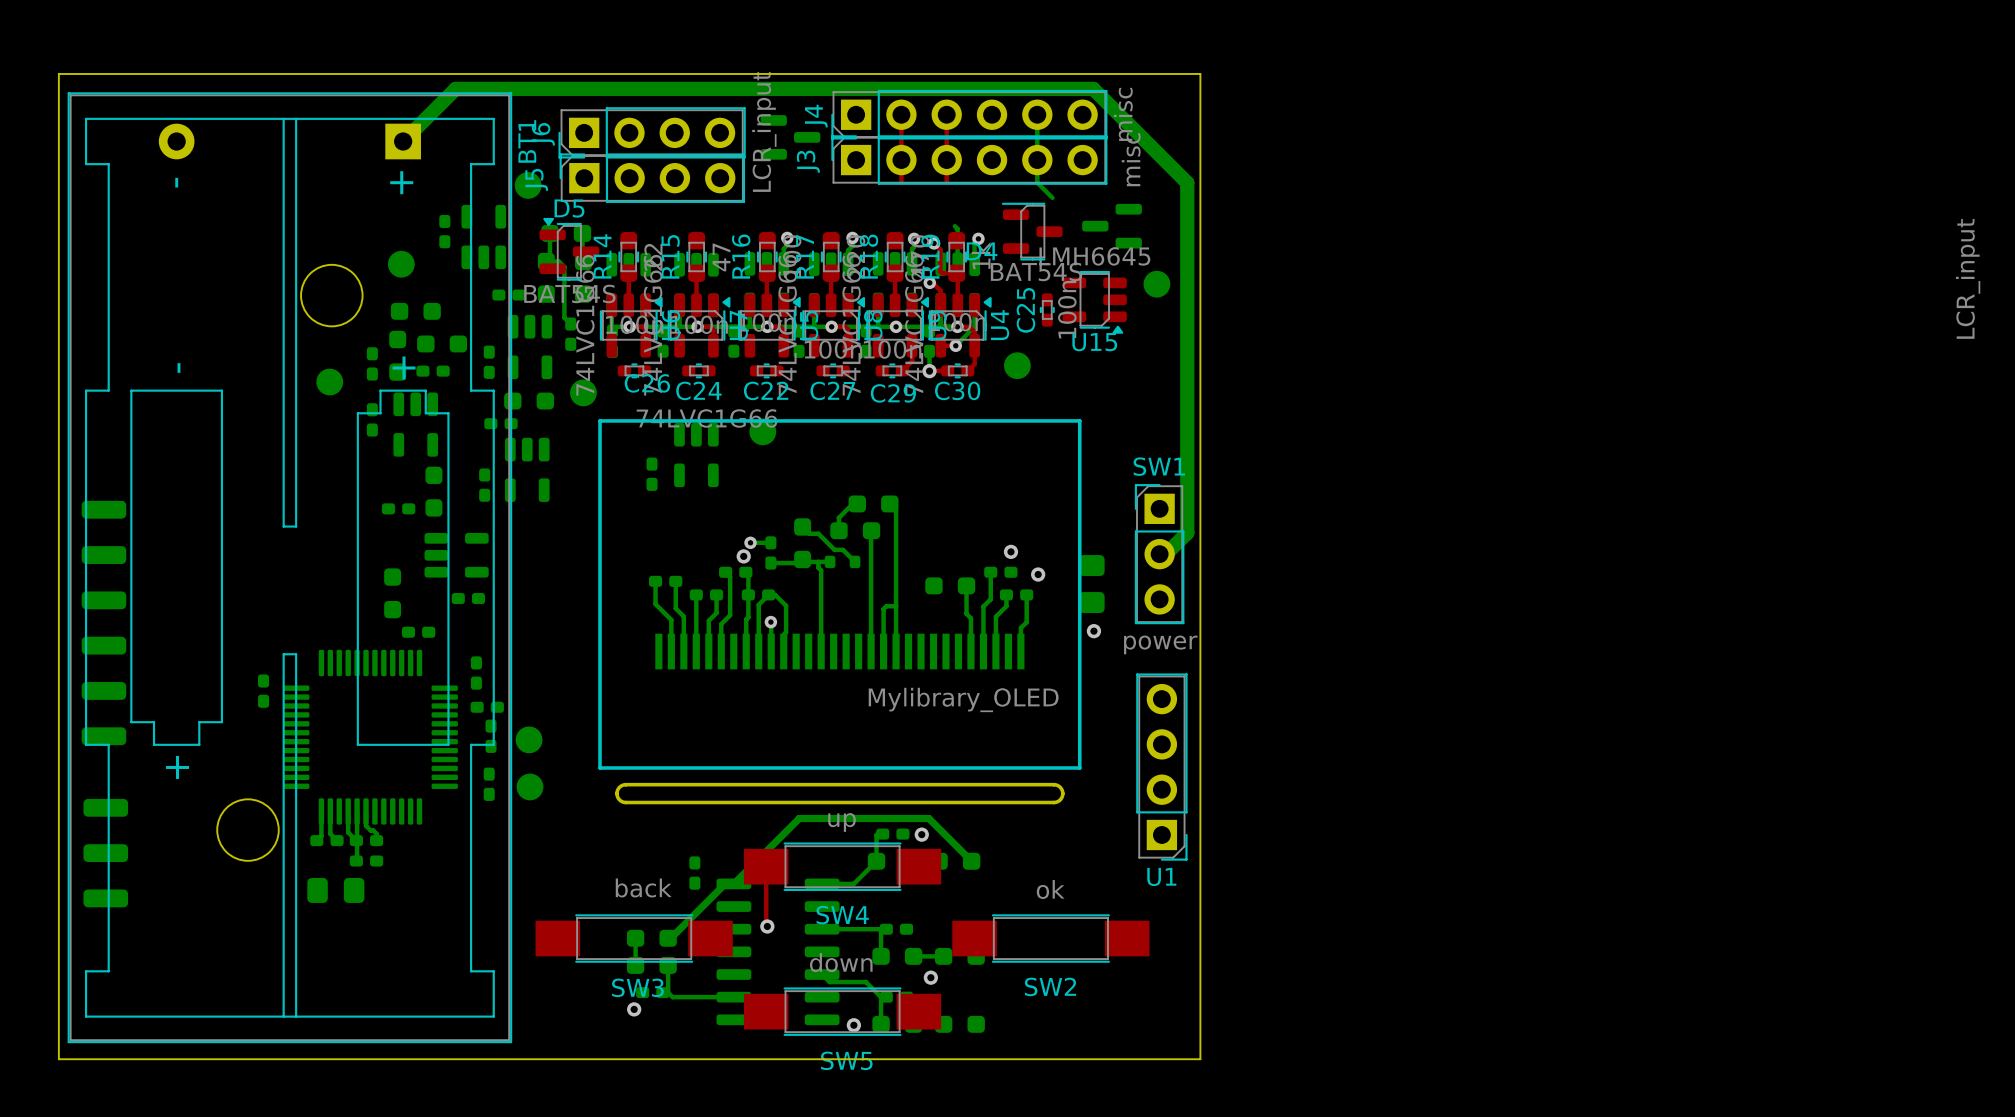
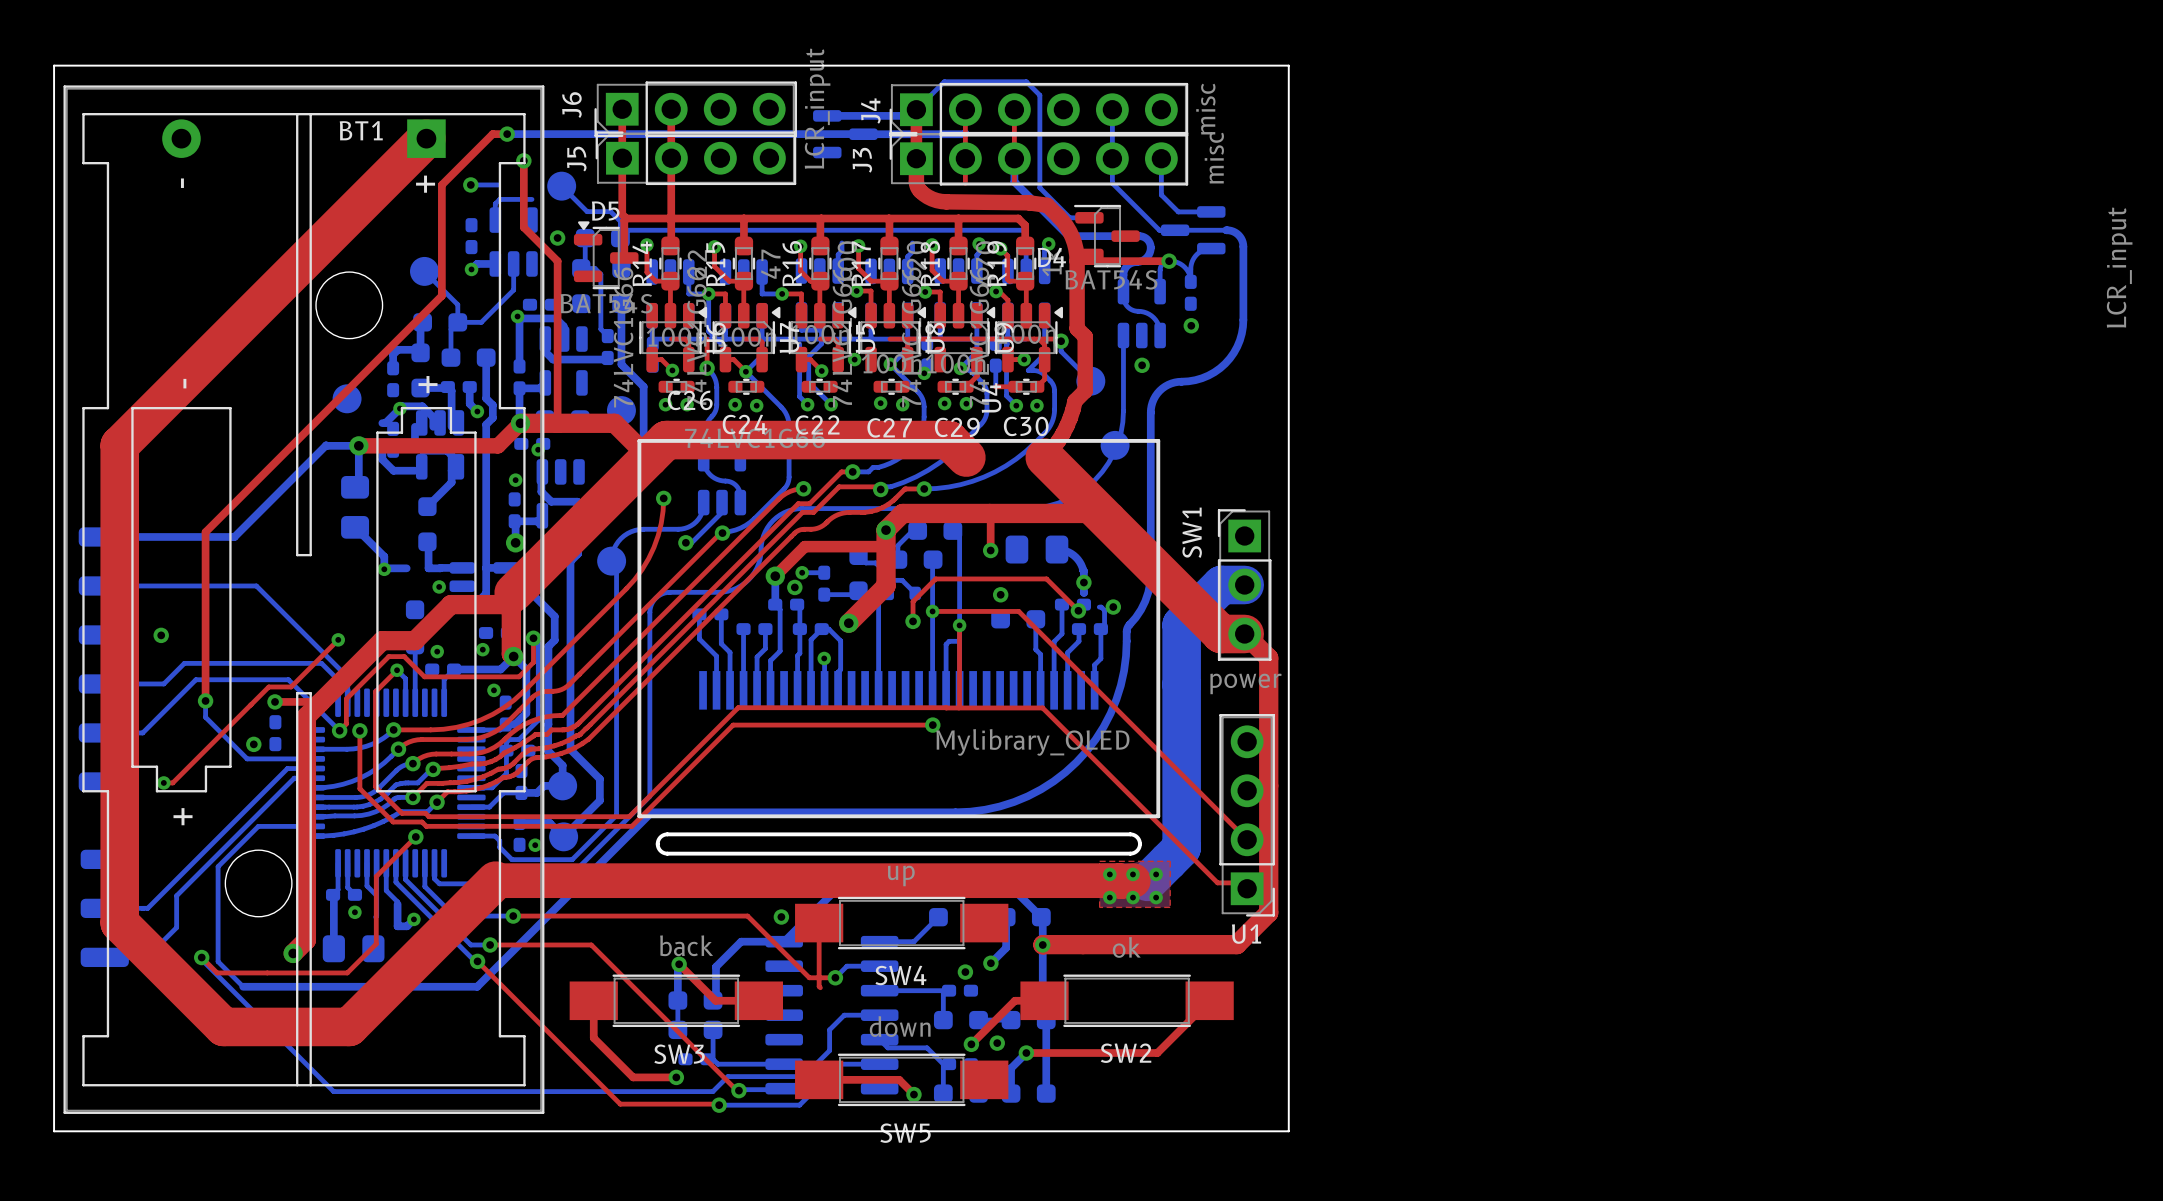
bottom track: (881, 88) (455, 88) (403, 141) -> (944, 81) (910, 115) (827, 115)
bottom track width: thick (881, 88) (957, 88) -> thin (944, 81) (1026, 81)
bottom track: (957, 88) (1093, 88) (1187, 182) (1187, 532) (1166, 554) -> (1026, 81) (1039, 95) (1039, 187) (1069, 217) (1089, 217)
top track: none -> (622, 109) (622, 214) (626, 218)
top track: none -> (671, 109) (670, 245)
top track: none -> (916, 109) (916, 181) (920, 191) (927, 196) (941, 201) (1029, 202) (1047, 205) (1069, 231) (1075, 248) (1077, 261)
J6 position: (652, 132) -> (695, 109)
J6 name position: J6 (543, 134) -> J6 (571, 105)
bottom track: none -> (965, 133) (863, 134)
bottom track: none -> (507, 134) (863, 134)
top track: none -> (507, 134) (492, 134) (441, 184) (441, 295) (205, 532) (205, 700)
via: none -> (507, 134)
top track: none -> (426, 138) (119, 445) (119, 923) (223, 1026) (349, 1026) (495, 880)
BT1 name rotation: 0° (527, 141) -> 90° clockwise (361, 130)
BT1 name position: BT1 (527, 141) -> BT1 (361, 130)
bottom track: none -> (1014, 158) (1014, 181) (1068, 236) (1139, 236) (1148, 240) (1150, 247) (1147, 256) (1141, 261) (1129, 263) (1124, 270) (1123, 298) (1130, 309) (1146, 312) (1153, 317) (1158, 324) (1160, 335)
bottom track: none -> (1161, 158) (1161, 194) (1178, 211) (1211, 211)
top track: none -> (523, 160) (523, 227) (557, 261) (557, 423)
via: none -> (523, 160)
J5 position: (652, 178) -> (695, 158)
J5 name position: J5 (536, 179) -> J5 (576, 159)
bottom track: none -> (470, 184) (498, 184)
via: none -> (470, 184)
bottom track: none -> (561, 186) (587, 211) (610, 211) (620, 221) (620, 238) (628, 230) (1023, 230)
bottom track: none -> (531, 199) (499, 199) (495, 203) (495, 220)
bottom track: none -> (1128, 199) (1159, 230) (1226, 230) (1238, 235) (1243, 246) (1242, 326) (1237, 346) (1229, 358) (1220, 368) (1202, 378) (1168, 384) (1159, 390) (1153, 399) (1150, 412) (1150, 573) (1148, 592) (1141, 609) (1127, 629) (1124, 670) (1110, 713) (1086, 751) (1053, 781) (1014, 802) (970, 811) (651, 812) (477, 986) (243, 986) (218, 961) (218, 866) (258, 826) (310, 826)
top track: none -> (626, 218) (1018, 218) (1025, 225) (1025, 245)
top track: none -> (626, 218) (624, 220) (624, 257)
top track: none -> (743, 218) (743, 245)
top track: none -> (821, 218) (820, 245)
top track: none -> (888, 218) (889, 245)
top track: none -> (958, 218) (958, 245)
via: none -> (557, 238)
via position: (787, 237) -> (858, 245)
via position: (852, 237) -> (932, 244)
top track: none -> (646, 244) (646, 272) (655, 281) (670, 281)
via: none -> (646, 244)
top track: none -> (932, 244) (932, 270) (942, 281) (958, 281)
top track: none -> (800, 246) (800, 271) (810, 281) (820, 281)
via: none -> (800, 246)
top track: none -> (858, 245) (858, 268) (871, 281) (889, 281)
top track: none -> (714, 246) (714, 266) (729, 281) (743, 281)
via: none -> (714, 246)
bottom track: none -> (1211, 248) (1200, 251) (1193, 258) (1190, 266) (1190, 281) (1188, 271) (1182, 265) (1172, 261) (1163, 263) (1160, 269) (1160, 291)
top track: none -> (1077, 261) (1169, 261)
top track: none -> (1077, 261) (1077, 328) (1085, 336) (1085, 390) (1075, 401) (1063, 433) (1044, 457) (1221, 633) (1244, 633) (1268, 658) (1268, 912) (1236, 944) (1042, 944)
via: none -> (1169, 261)
bottom track: none -> (495, 263) (477, 263) (471, 269)
bottom track: none -> (513, 263) (513, 290) (481, 322) (457, 322)
via: none -> (471, 269)
bottom track: none -> (424, 271) (457, 304) (457, 322)
bottom track: none -> (688, 272) (688, 293) (708, 293) (708, 331) (723, 345)
bottom track: none -> (762, 272) (762, 293) (782, 293)
top track: none -> (856, 291) (871, 291) (871, 315)
via: none -> (856, 291)
top track: none -> (925, 291) (940, 291) (940, 315)
via: none -> (925, 291)
part: (1156, 284) -> none
top track: none -> (708, 293) (725, 293) (725, 315)
via: none -> (708, 293)
top track: none -> (782, 293) (801, 293) (801, 315)
via: none -> (782, 293)
bottom track: none -> (621, 303) (621, 364) (643, 386) (643, 442) (579, 506) (578, 522)
U15 side: top (1094, 302) -> bottom (1141, 313)
bottom track: none -> (907, 315) (907, 348) (890, 364) (922, 398) (924, 416) (920, 434) (910, 449) (895, 460) (884, 465) (873, 467) (868, 471) (852, 471)
bottom track: none -> (976, 314) (976, 352) (960, 368) (972, 372) (985, 387) (986, 410) (984, 420) (960, 445) (939, 462) (916, 476) (891, 486) (883, 486) (880, 489)
bottom track: (974, 304) (974, 327) (955, 345) -> (1044, 315) (1044, 354) (1028, 370) (1040, 372) (1053, 385) (1054, 412) (1048, 428) (1025, 451) (995, 471) (960, 484) (924, 488)
via: none -> (517, 316)
bottom track: none -> (762, 315) (762, 355) (745, 371) (781, 407) (787, 415) (789, 426) (788, 479) (784, 488) (750, 522) (740, 528) (722, 533)
C25 side: top (1047, 309) -> bottom (1190, 292)
bottom track: none -> (422, 322) (420, 324) (420, 352) (417, 349) (398, 349) (393, 354) (393, 368)
bottom track: none -> (457, 322) (450, 329) (450, 357)
via: none -> (1191, 325)
bottom track: (749, 318) (749, 326) -> (801, 330) (821, 330) (821, 343) (808, 356) (808, 382) (832, 404)
bottom track: none -> (1123, 335) (1123, 411) (1121, 432) (1108, 463) (1086, 487) (1058, 503) (1037, 507) (802, 508) (788, 510) (780, 514) (773, 520) (765, 531) (756, 568) (751, 576) (741, 585) (723, 592) (664, 593) (655, 598) (651, 604) (649, 796) (562, 883) (439, 883) (434, 878) (434, 863)
U4 name position: U4 (1000, 325) -> U4 (991, 397)
bottom track: none -> (545, 339) (545, 351) (553, 359) (606, 359) (607, 357)
bottom track: none -> (563, 339) (563, 326) (555, 318) (519, 318) (519, 366)
via: (629, 326) -> none
top track: none -> (707, 339) (707, 368)
via: (697, 326) -> none
via: (767, 326) -> none
via: (831, 326) -> none
via: (896, 326) -> none
via: (957, 326) -> none
bottom track: none -> (1061, 341) (1061, 351) (1090, 381)
via: none -> (1061, 341)
bottom track: none -> (799, 343) (799, 396) (807, 404)
bottom track: none -> (1007, 343) (1006, 395) (1016, 405)
part: (663, 341) -> none
part: (733, 341) -> none
part: (799, 341) -> none
bottom track: none -> (486, 357) (486, 398) (492, 405) (492, 417) (486, 424) (486, 593) (475, 604) (462, 604)
top track: none -> (652, 359) (661, 359) (672, 370)
top track: none -> (725, 359) (733, 359) (745, 371)
top track: none -> (801, 359) (810, 359) (821, 370)
via: none -> (854, 359)
via: none -> (890, 364)
via: none -> (1142, 365)
bottom track: none -> (707, 368) (715, 381) (716, 404) (714, 413) (704, 429) (704, 464) (708, 472) (714, 478) (730, 481) (735, 485) (739, 492) (740, 502)
via: none -> (707, 368)
via: none -> (960, 368)
via: none -> (672, 370)
via: none -> (745, 371)
via: none -> (821, 370)
via: none -> (924, 373)
bottom track: none -> (545, 382) (539, 388) (519, 388) (520, 423)
bottom track: none -> (469, 387) (469, 403) (477, 411)
via: (929, 371) -> none
bottom track: none -> (420, 388) (447, 387) (451, 390) (451, 426)
via: none -> (880, 403)
via: none -> (944, 403)
via: none -> (966, 403)
via: none -> (665, 404)
via: none -> (687, 404)
via: none -> (735, 404)
via: none -> (807, 404)
via: none -> (831, 404)
via: none -> (902, 404)
via: none -> (756, 405)
via: none -> (1016, 405)
via: none -> (1036, 405)
C24 name position: C24 (698, 390) -> C24 (744, 424)
C22 name position: C22 (766, 390) -> C22 (817, 425)
C27 name position: C27 (832, 390) -> C27 (889, 427)
C30 name position: C30 (957, 390) -> C30 (1026, 426)
via: none -> (399, 408)
via: none -> (477, 411)
C29 name position: C29 (893, 393) -> C29 (957, 427)
bottom track: none -> (382, 423) (385, 423) (402, 406) (422, 406) (433, 417) (433, 426)
via: none -> (520, 423)
bottom track: none -> (414, 426) (414, 442) (422, 450) (447, 450) (451, 455) (451, 482) (427, 506)
bottom track: none -> (358, 445) (358, 483) (355, 487)
bottom track: none -> (358, 445) (326, 445) (234, 536) (102, 536)
bottom track: none -> (358, 445) (382, 445) (382, 459) (393, 470) (414, 470)
top track: none -> (358, 445) (497, 445) (520, 423) (614, 423) (648, 457)
via: none -> (358, 445)
part: none -> (1115, 445)
via: none -> (538, 449)
part: (762, 431) -> none
top track: none -> (966, 457) (948, 440) (666, 440) (513, 592)
top track: none -> (852, 471) (841, 471) (809, 503) (798, 503) (577, 724) (567, 729) (551, 729) (547, 734) (535, 734) (524, 742)
via: none -> (852, 471)
bottom track: none -> (541, 478) (541, 491) (551, 501) (578, 502) (578, 553) (570, 561) (570, 749) (599, 779) (599, 800) (563, 836) (549, 822) (519, 822)
part rotation: 0° (696, 455) -> 180° (722, 480)
via: none -> (515, 480)
top track: none -> (803, 488) (790, 491) (778, 499) (562, 715) (545, 716) (531, 721) (517, 728) (494, 747) (482, 752) (431, 754) (423, 756) (412, 763)
via: none -> (803, 488)
top track: none -> (880, 489) (878, 486) (839, 486) (813, 512) (802, 512) (579, 734) (554, 745) (531, 749) (509, 766) (475, 779) (458, 782) (426, 783) (412, 797)
via: none -> (880, 489)
top track: none -> (924, 488) (904, 488) (888, 504) (877, 509) (840, 513) (819, 527) (797, 531) (588, 739) (561, 753) (531, 758) (513, 775) (503, 777) (489, 784) (466, 791) (447, 791) (437, 802)
via: none -> (924, 488)
SW1 name rotation: 0° (1159, 466) -> 90° counterclockwise (1192, 532)
top track: none -> (663, 498) (658, 535) (642, 569) (626, 588) (514, 700) (492, 714) (456, 727) (393, 729)
via: none -> (663, 498)
part: (652, 474) -> none
bottom track: none -> (703, 502) (700, 516) (690, 525) (681, 529) (643, 529) (631, 531) (620, 538) (612, 552) (611, 561) (616, 566) (616, 815) (572, 859) (512, 859) (499, 847) (499, 840) (494, 836) (471, 836)
bottom track: none -> (722, 502) (722, 512) (691, 542) (685, 542)
part: none -> (355, 507)
top track: none -> (989, 513) (990, 550)
top track: none -> (1114, 513) (902, 513) (886, 530)
part: (433, 491) -> none
bottom track: none -> (541, 522) (514, 521) (515, 542)
bottom track: none -> (355, 527) (384, 556) (384, 569) (406, 568)
part footprint: [381, 503, 416, 515] -> [418, 497, 437, 552]
top track: none -> (886, 530) (886, 546) (804, 546) (775, 576)
top track: none -> (886, 530) (886, 585) (848, 623)
via: none -> (886, 530)
top track: none -> (722, 533) (564, 688) (536, 694) (501, 727) (488, 735) (473, 739) (417, 739) (405, 743) (398, 749)
via: none -> (722, 533)
bottom track: none -> (427, 541) (428, 568) (462, 567)
via: none -> (515, 542)
via: none -> (685, 542)
bottom track: none -> (1056, 549) (1071, 553) (1079, 561) (1083, 570) (1083, 592)
via: none -> (990, 550)
part: none -> (611, 561)
bottom track: none -> (486, 568) (506, 567) (554, 616) (554, 640) (548, 646) (548, 724)
via: none -> (384, 569)
bottom track: none -> (775, 576) (775, 604)
via: none -> (775, 576)
bottom track: none -> (1244, 584) (1221, 584) (1181, 624) (1181, 847) (1147, 881)
bottom track: none -> (102, 585) (256, 585) (347, 677) (347, 702)
via: none -> (439, 586)
top track: none -> (513, 592) (511, 595) (511, 654) (513, 656)
top track: none -> (513, 592) (513, 604) (450, 604) (414, 640) (382, 640) (306, 716) (306, 940) (293, 953)
via: none -> (1000, 594)
bottom track: none -> (1099, 607) (1104, 610) (1104, 625) (1100, 629)
top track: none -> (1078, 610) (1046, 578) (935, 578) (913, 601) (913, 621)
via: none -> (1078, 610)
top track: none -> (932, 611) (1018, 611) (1238, 831) (1238, 833)
via: none -> (932, 611)
part rotation: 0° (1091, 584) -> 90° clockwise (1036, 549)
part position: (1091, 584) -> (1036, 549)
via: none -> (913, 621)
via: none -> (848, 623)
top track: none -> (959, 625) (958, 707)
via: none -> (959, 625)
via: none -> (161, 635)
bottom track: none -> (533, 638) (538, 643) (538, 720) (519, 739) (509, 739) (506, 742) (506, 773) (492, 787) (471, 787)
top track: none -> (533, 638) (533, 662) (519, 676) (424, 676) (404, 656) (388, 656) (346, 699) (346, 723) (339, 730)
via: none -> (533, 638)
top track: none -> (338, 639) (291, 686) (268, 686) (172, 782) (163, 782)
via: none -> (338, 639)
bottom track: none -> (415, 645) (415, 702)
via: none -> (482, 649)
via: none -> (437, 651)
bottom track: none -> (513, 656) (500, 669) (454, 669) (444, 679) (444, 702)
bottom track: none -> (513, 656) (526, 669) (526, 713) (514, 724) (505, 724) (500, 729) (471, 729)
via: none -> (513, 656)
via: (1093, 631) -> none
bottom track: none -> (397, 670) (405, 678) (405, 702)
top track: none -> (397, 670) (375, 691) (375, 786) (401, 813) (425, 813) (429, 816) (629, 816) (738, 707) (946, 707)
via: none -> (397, 670)
bottom track: none -> (102, 683) (163, 683) (184, 663) (321, 663) (338, 679) (338, 702)
via: none -> (493, 690)
bottom track: none -> (205, 700) (205, 717) (247, 758) (310, 758)
via: none -> (205, 700)
top track: none -> (275, 701) (319, 703)
via: none -> (275, 701)
top track: none -> (946, 707) (1042, 707) (1217, 882) (1238, 882)
bottom track: none -> (548, 724) (548, 750) (562, 765) (562, 785) (544, 785) (537, 792) (503, 792) (489, 807) (471, 807)
top track: none -> (932, 725) (733, 725) (631, 826) (426, 826) (422, 822) (393, 822) (359, 788) (359, 730)
via: none -> (932, 725)
bottom track: none -> (339, 730) (288, 679) (195, 679) (142, 732) (102, 732)
via: none -> (339, 730)
bottom track: none -> (393, 729) (378, 741) (359, 747) (310, 749)
via: none -> (393, 729)
via: none -> (359, 730)
top track: none -> (523, 742) (490, 761) (433, 769)
via: none -> (253, 744)
bottom track: none -> (398, 749) (376, 768) (360, 777) (333, 786) (310, 787)
via: none -> (398, 749)
bottom track: none -> (412, 763) (398, 768) (376, 789) (365, 796) (310, 797)
via: none -> (412, 763)
bottom track: none -> (310, 768) (287, 768) (147, 908) (104, 908)
bottom track: none -> (433, 769) (417, 782) (395, 784) (380, 799) (369, 804) (357, 807) (310, 807)
via: none -> (433, 769)
bottom track: none -> (310, 778) (294, 778) (176, 895) (176, 927) (147, 957)
via: none -> (163, 782)
bottom track: none -> (412, 797) (396, 797) (382, 808) (361, 815) (310, 816)
via: none -> (412, 797)
bottom track: none -> (437, 802) (427, 811) (401, 811) (383, 821) (354, 831) (310, 836)
via: none -> (437, 802)
top track: none -> (415, 836) (376, 876) (376, 944) (347, 972) (217, 972) (201, 957)
via: none -> (415, 836)
via: none -> (535, 845)
top zone outline: none -> (1099, 861) (1099, 907) (1170, 907) (1170, 861) (1099, 861)
bottom track: none -> (395, 863) (395, 882) (475, 961) (477, 961)
bottom track: none -> (405, 863) (405, 879) (470, 944) (490, 944)
bottom track: none -> (424, 863) (424, 886) (454, 916) (513, 916)
via: none -> (1109, 874)
via: none -> (1132, 874)
via: none -> (1156, 874)
bottom track: (366, 825) (376, 833) (376, 840) -> (386, 878) (386, 890) (397, 901) (397, 926) (407, 926) (413, 919)
top track: none -> (1133, 880) (495, 880)
bottom track: (877, 834) (876, 861) -> none
part: (892, 834) -> none
via: (921, 834) -> none
bottom track: none -> (333, 894) (333, 955)
part: (366, 840) -> none
via: none -> (1109, 897)
via: none -> (1132, 897)
via: none -> (1156, 897)
via: none -> (354, 912)
top track: none -> (513, 916) (747, 916) (809, 977) (835, 977)
via: none -> (513, 916)
part: (366, 861) -> none
via: none -> (781, 917)
bottom track: none -> (1006, 917) (1006, 947) (990, 963)
bottom track: none -> (1041, 917) (1042, 1016) (1046, 1020) (1046, 1093)
via: none -> (413, 919)
part: (694, 873) -> none
bottom track: (725, 883) (670, 938) -> (774, 941) (741, 941) (715, 966) (715, 1000)
top track: none -> (490, 944) (591, 944) (738, 1090)
via: none -> (490, 944)
via: none -> (1042, 944)
via: none -> (293, 953)
bottom track: none -> (201, 957) (333, 1091) (712, 1091) (727, 1076) (803, 1076) (829, 1050) (829, 1029) (844, 1015) (879, 1015)
via: none -> (201, 957)
top track: none -> (477, 961) (620, 1104) (719, 1105)
via: none -> (477, 961)
via: none -> (990, 963)
bottom track: none -> (679, 964) (677, 1000)
top track: none -> (679, 964) (715, 1000) (758, 1000)
via: none -> (679, 964)
bottom track: none -> (879, 966) (846, 966) (835, 977)
via: none -> (965, 972)
via position: (767, 926) -> (835, 977)
top track: none -> (593, 1000) (593, 1038) (633, 1077) (676, 1077)
top track: none -> (1044, 1000) (1014, 1000) (971, 1044)
top track: none -> (1209, 1000) (1157, 1053) (1026, 1053)
via: none -> (971, 1044)
bottom track: none -> (1026, 1053) (1011, 1068) (1011, 1093)
via: none -> (1026, 1053)
bottom track: none -> (879, 1064) (839, 1064) (799, 1105) (719, 1105)
top track: none -> (819, 1079) (899, 1079) (913, 1094)
bottom track: none -> (784, 1088) (738, 1090)
via: none -> (738, 1090)
via: none -> (719, 1105)

